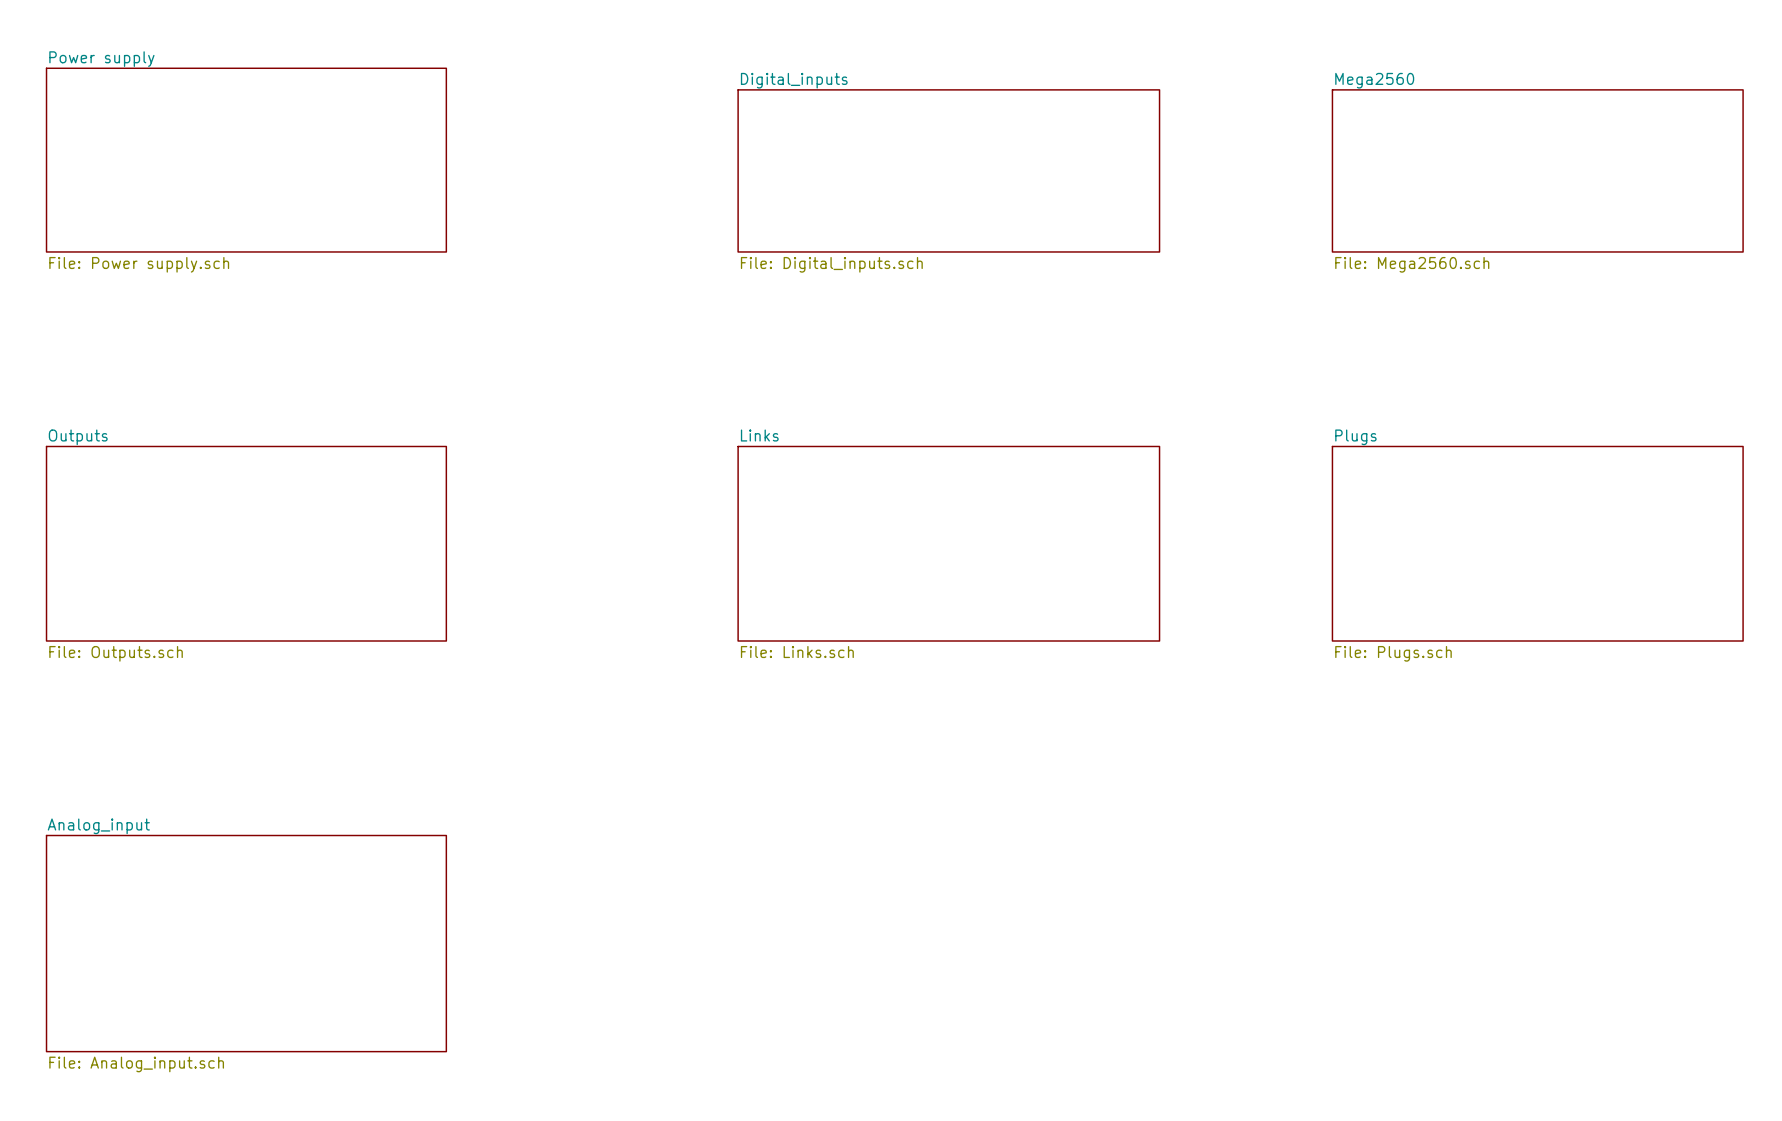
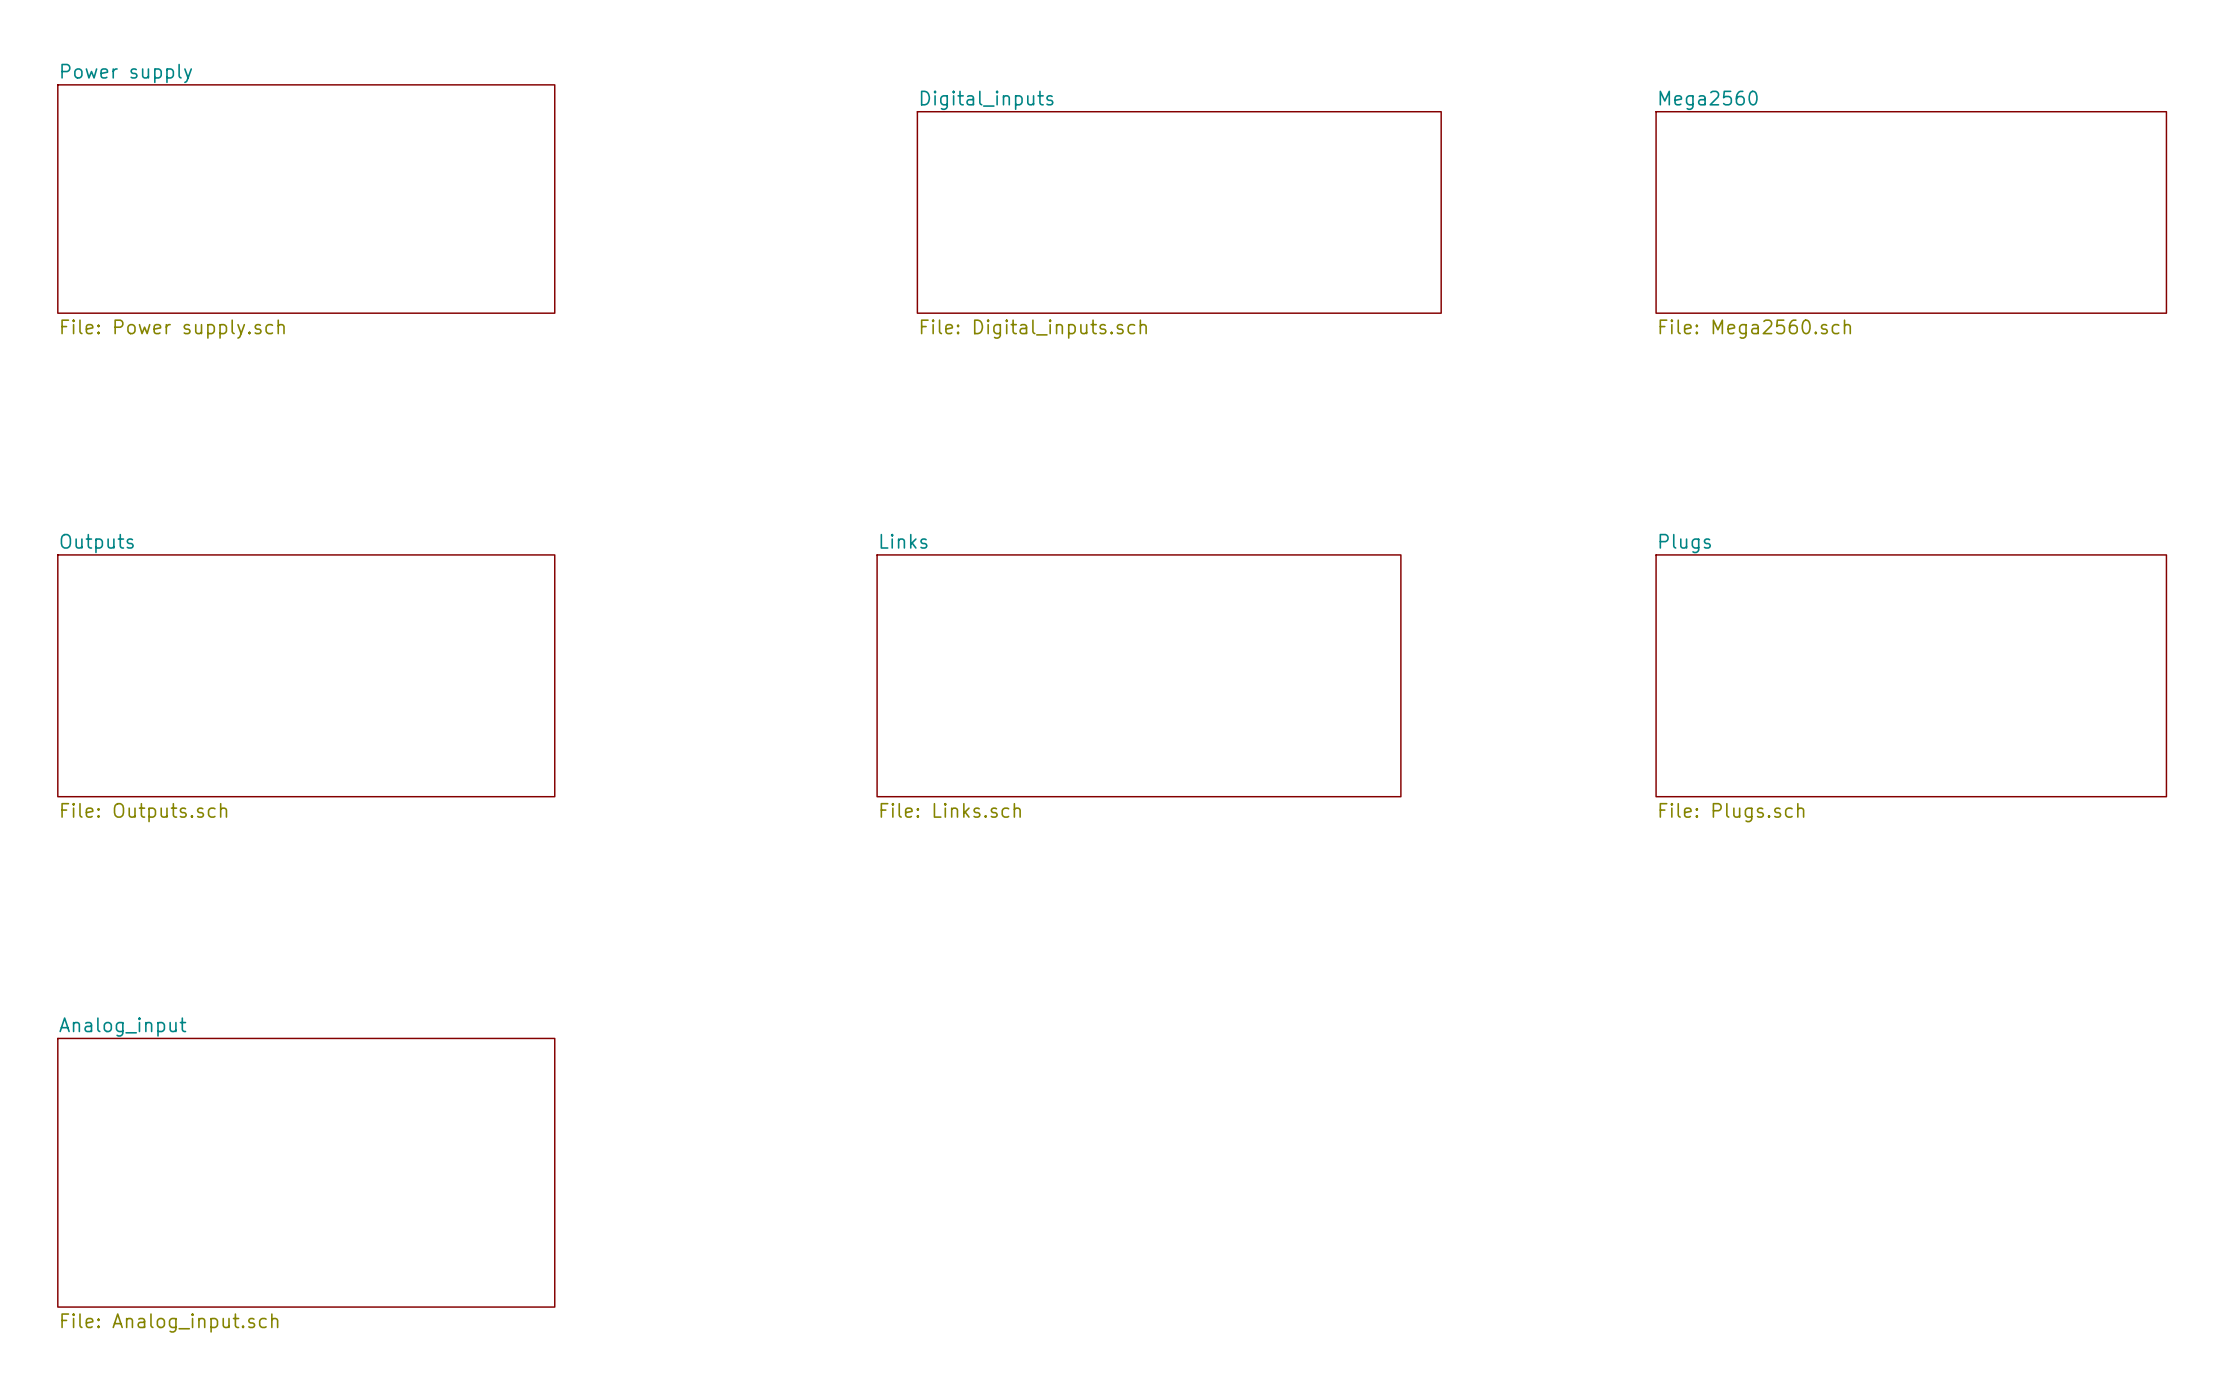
sheet Links position: (948, 543) -> (1138, 675)

